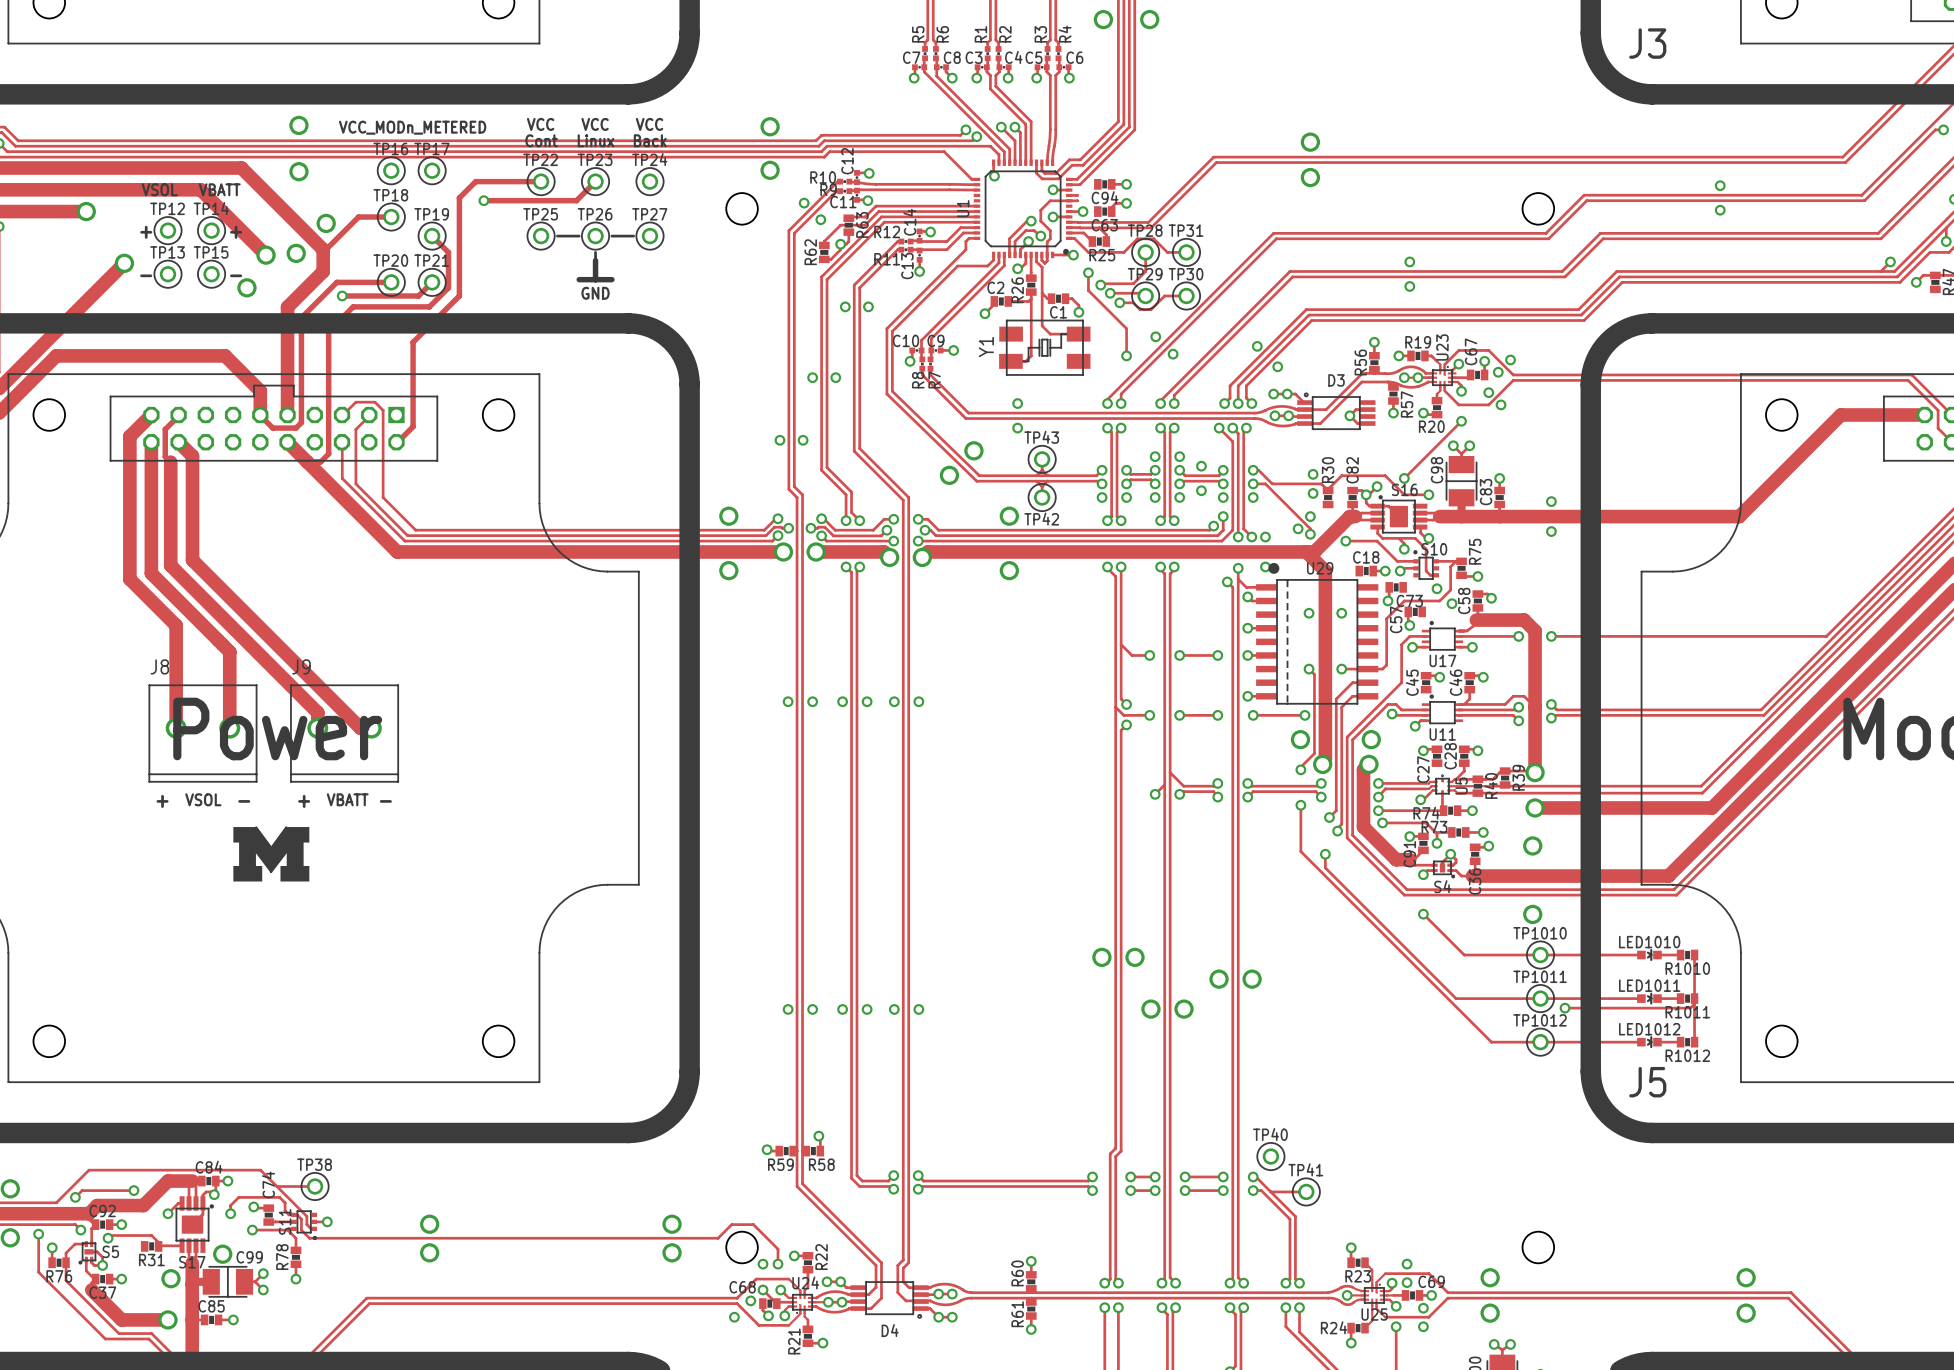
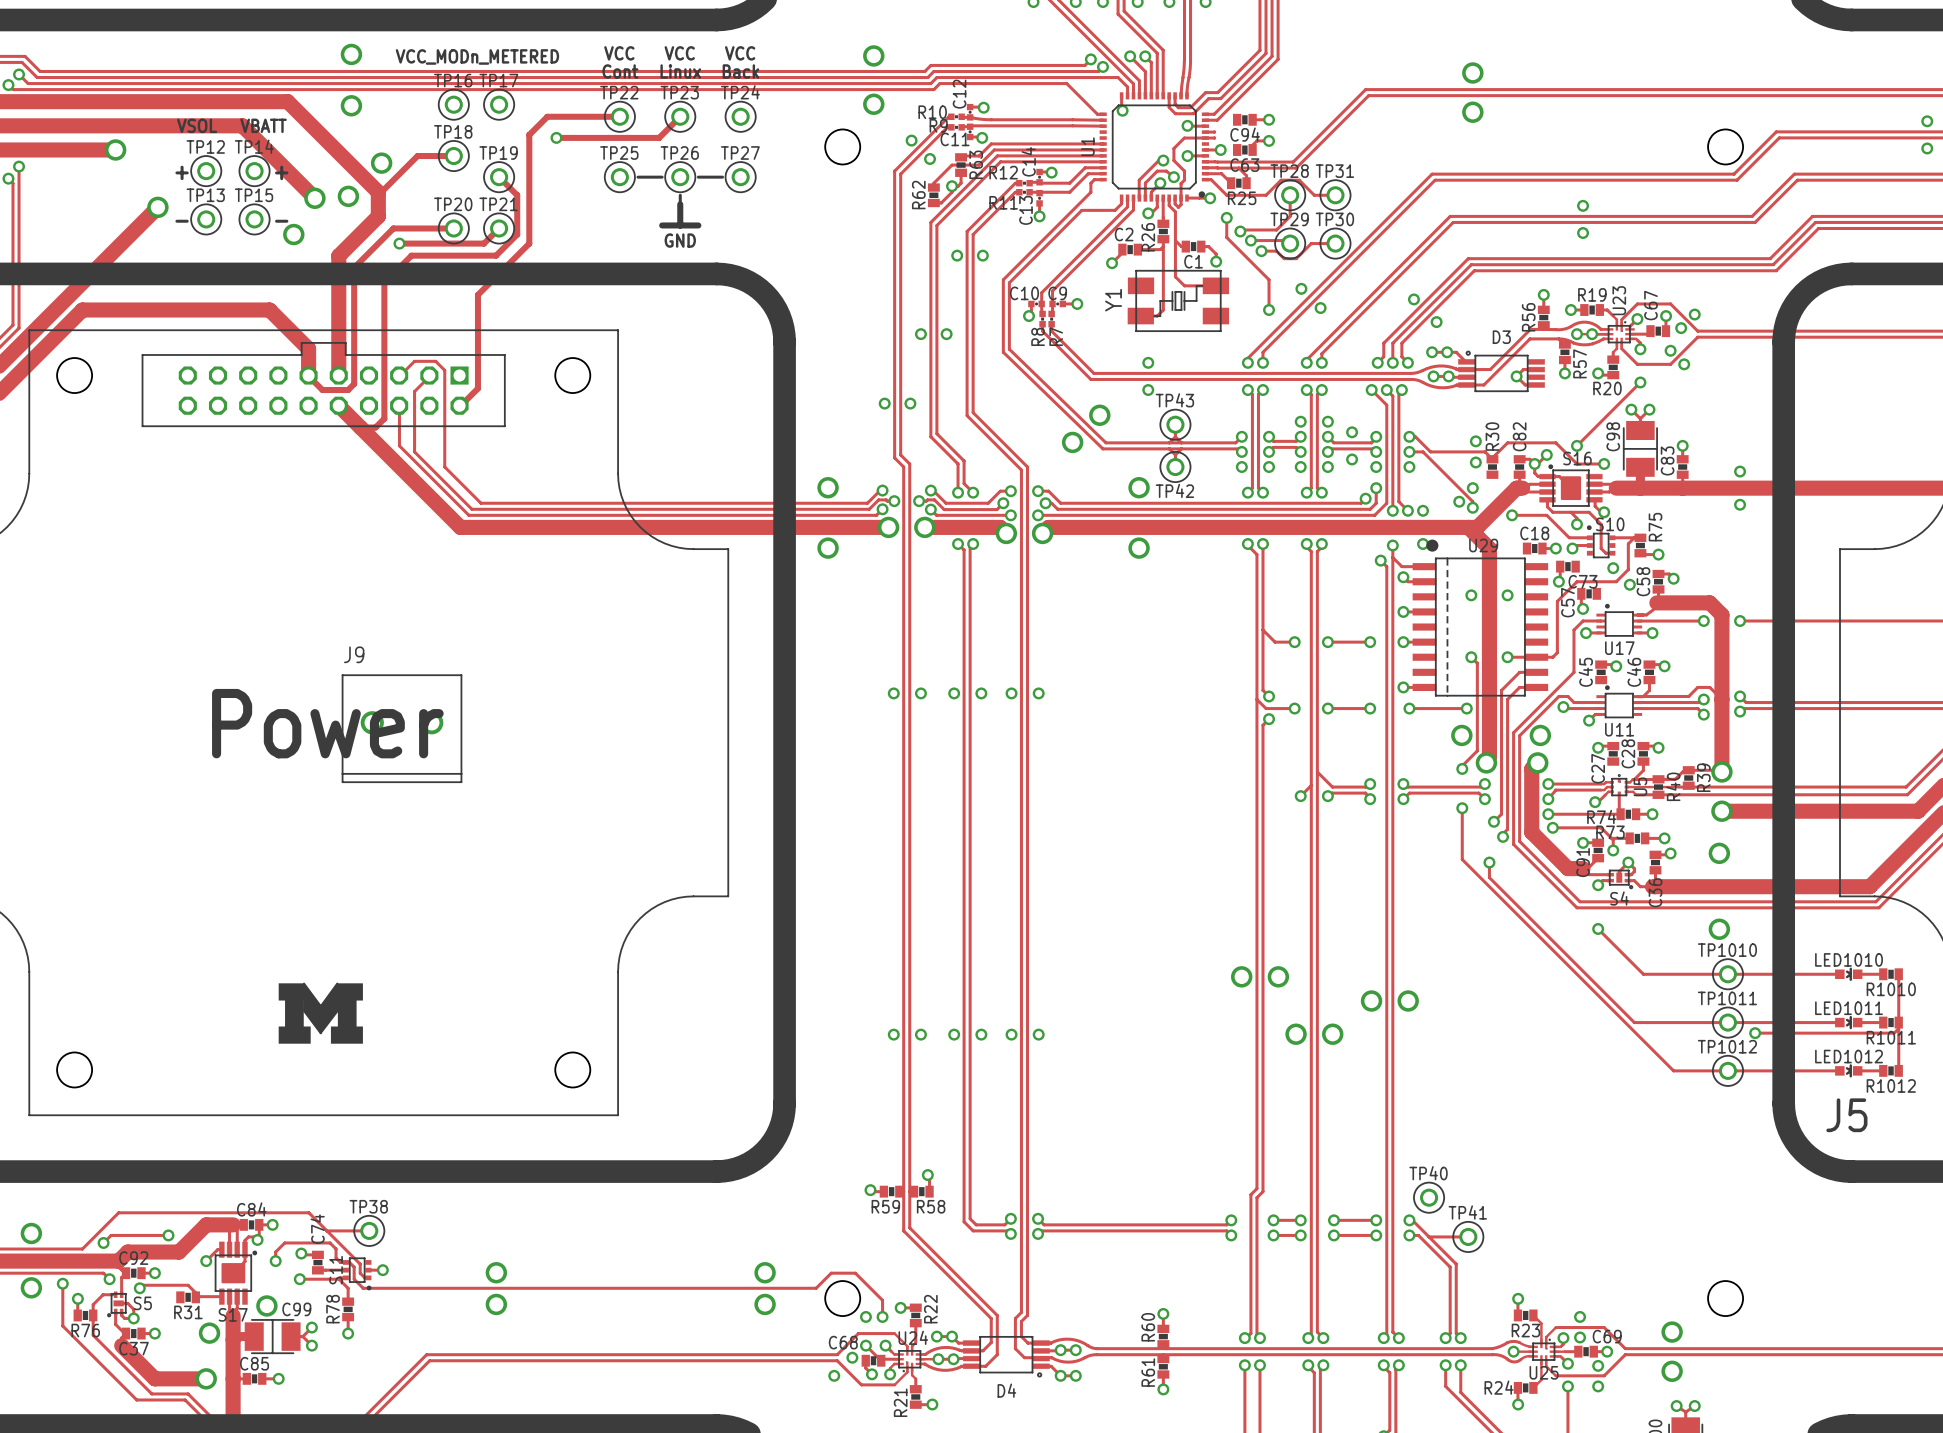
track: (151, 415) (129, 436) (129, 579) (176, 625) (176, 728) -> none
track: (178, 415) (165, 429) (165, 456) (170, 462) (170, 565) (317, 712) (317, 728) -> none
track: (151, 442) (151, 573) (229, 651) (229, 728) -> none
track: (178, 442) (192, 456) (192, 560) (360, 728) (371, 728) -> none
J8: (202, 733) -> none
text: VSOL (203, 799) -> none
text: VBATT (347, 799) -> none
text: + (162, 801) -> none
text: - (244, 801) -> none
text: + (304, 801) -> none
text: - (385, 801) -> none
drawing position: (271, 854) -> (320, 1013)

